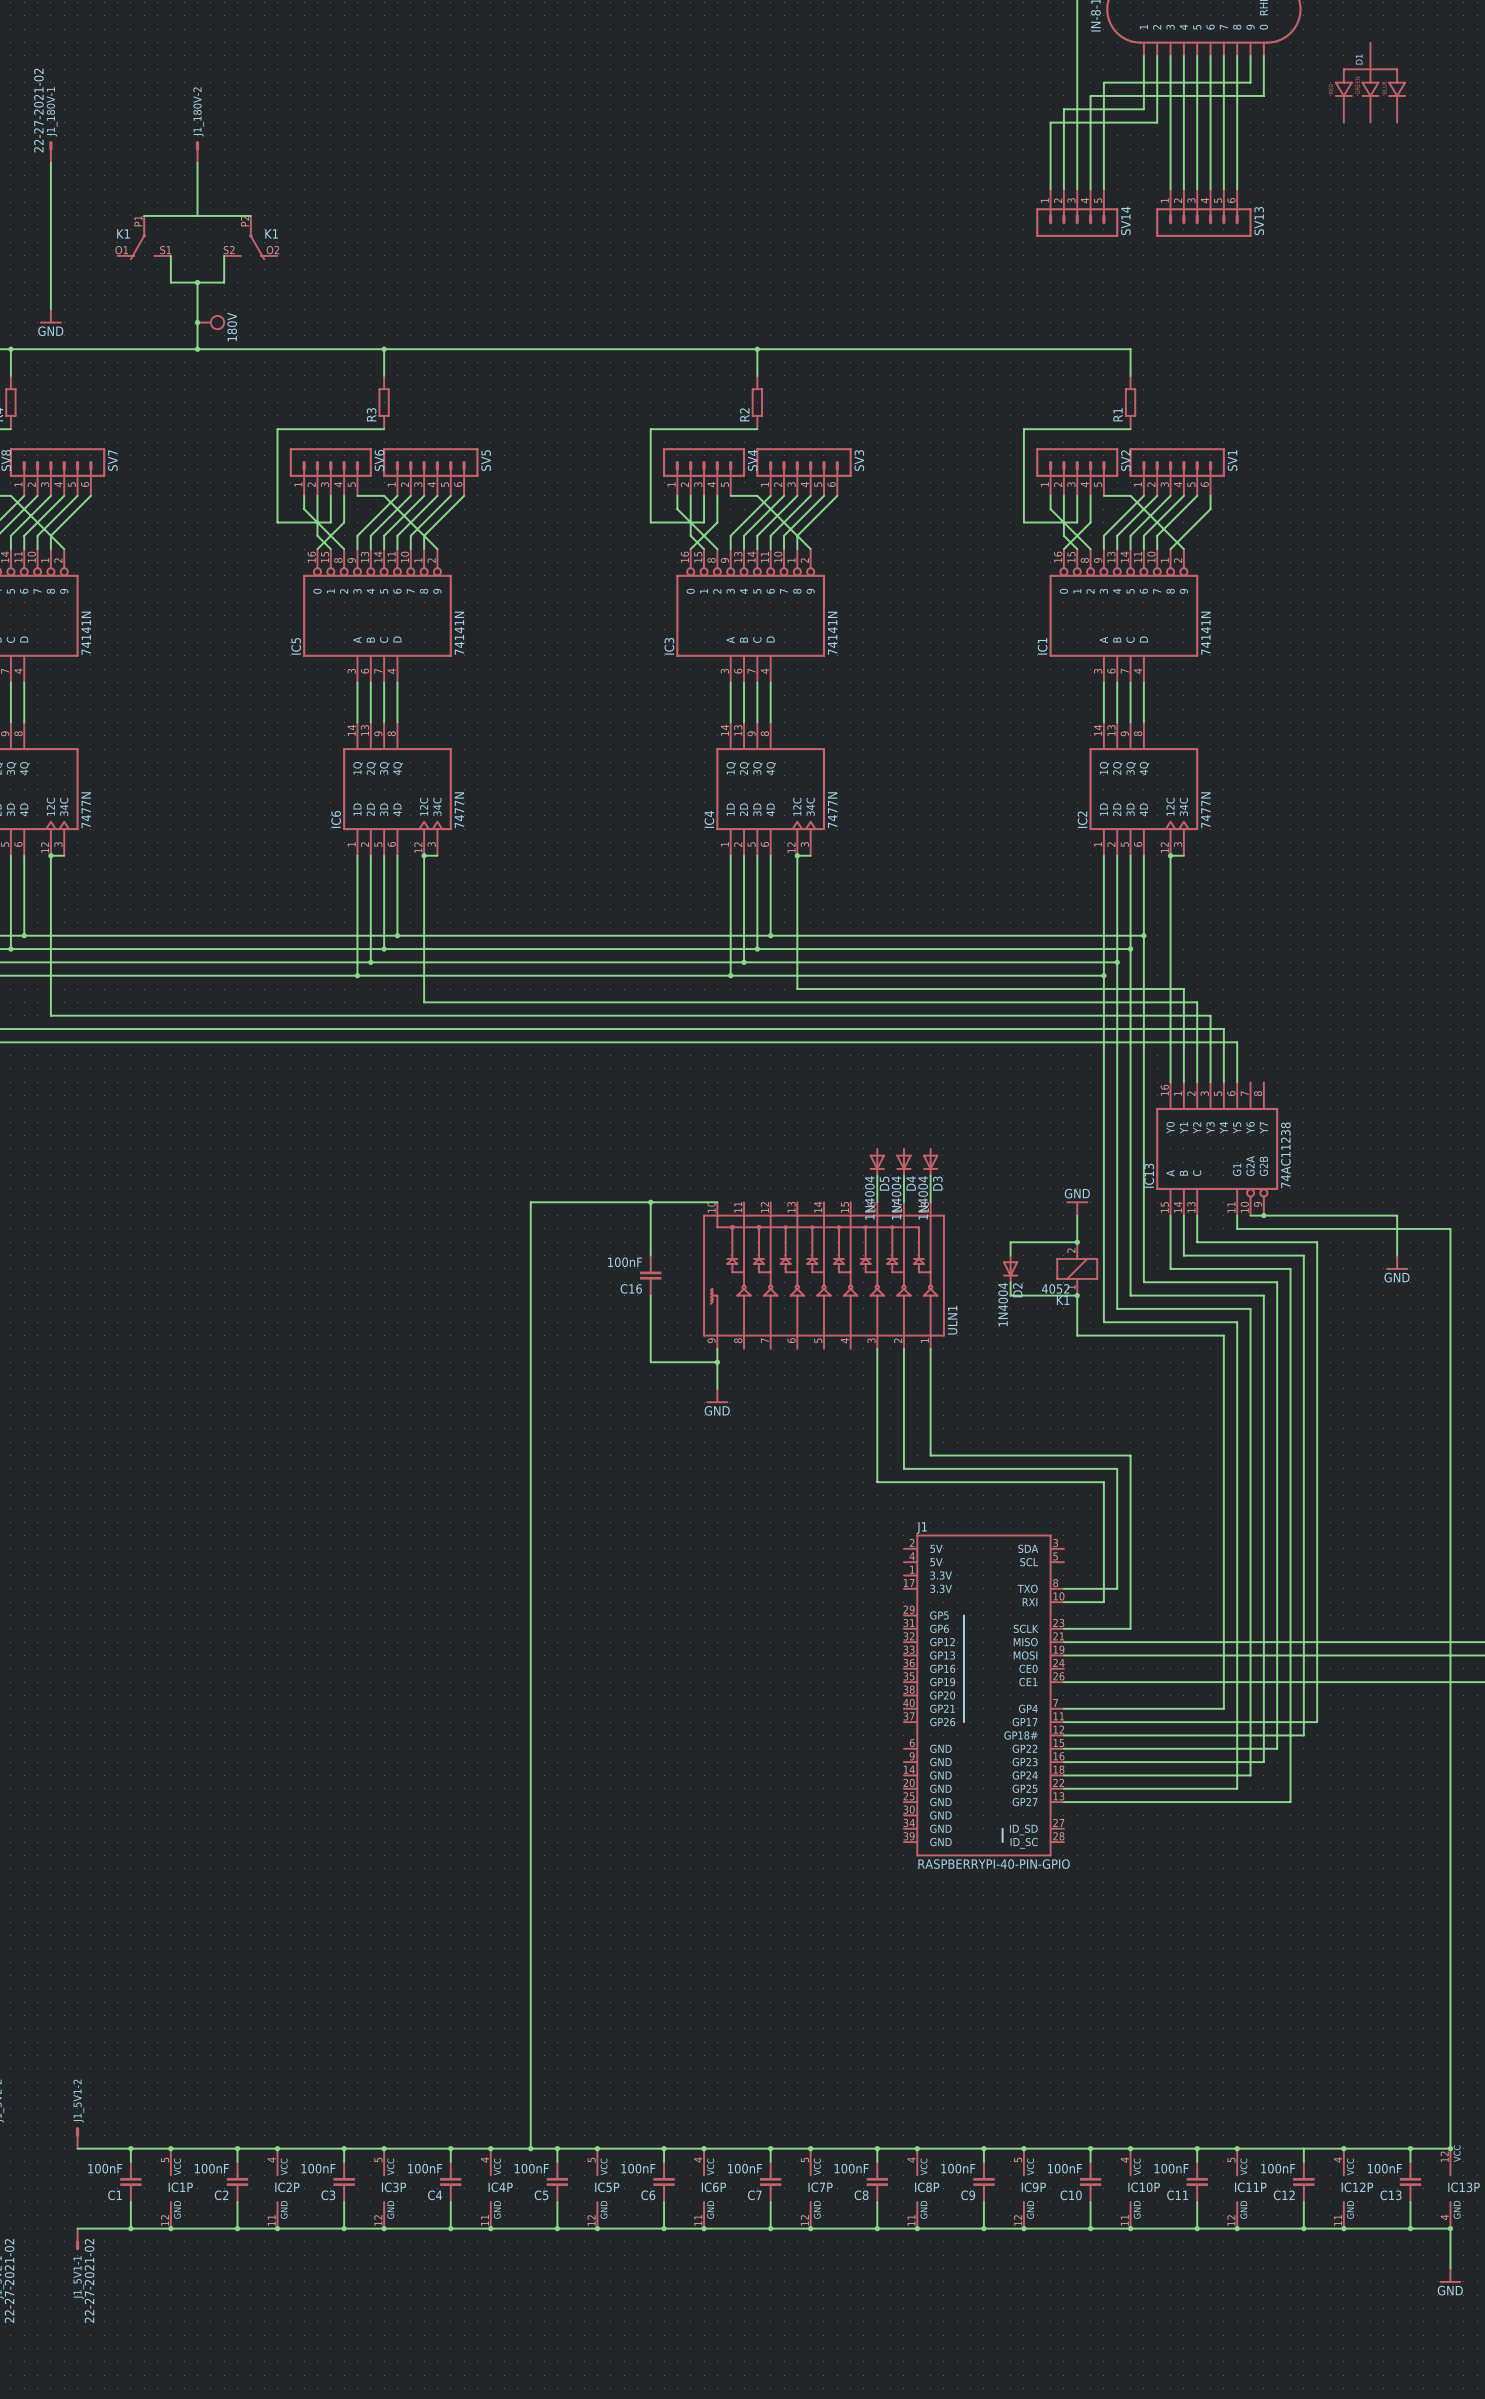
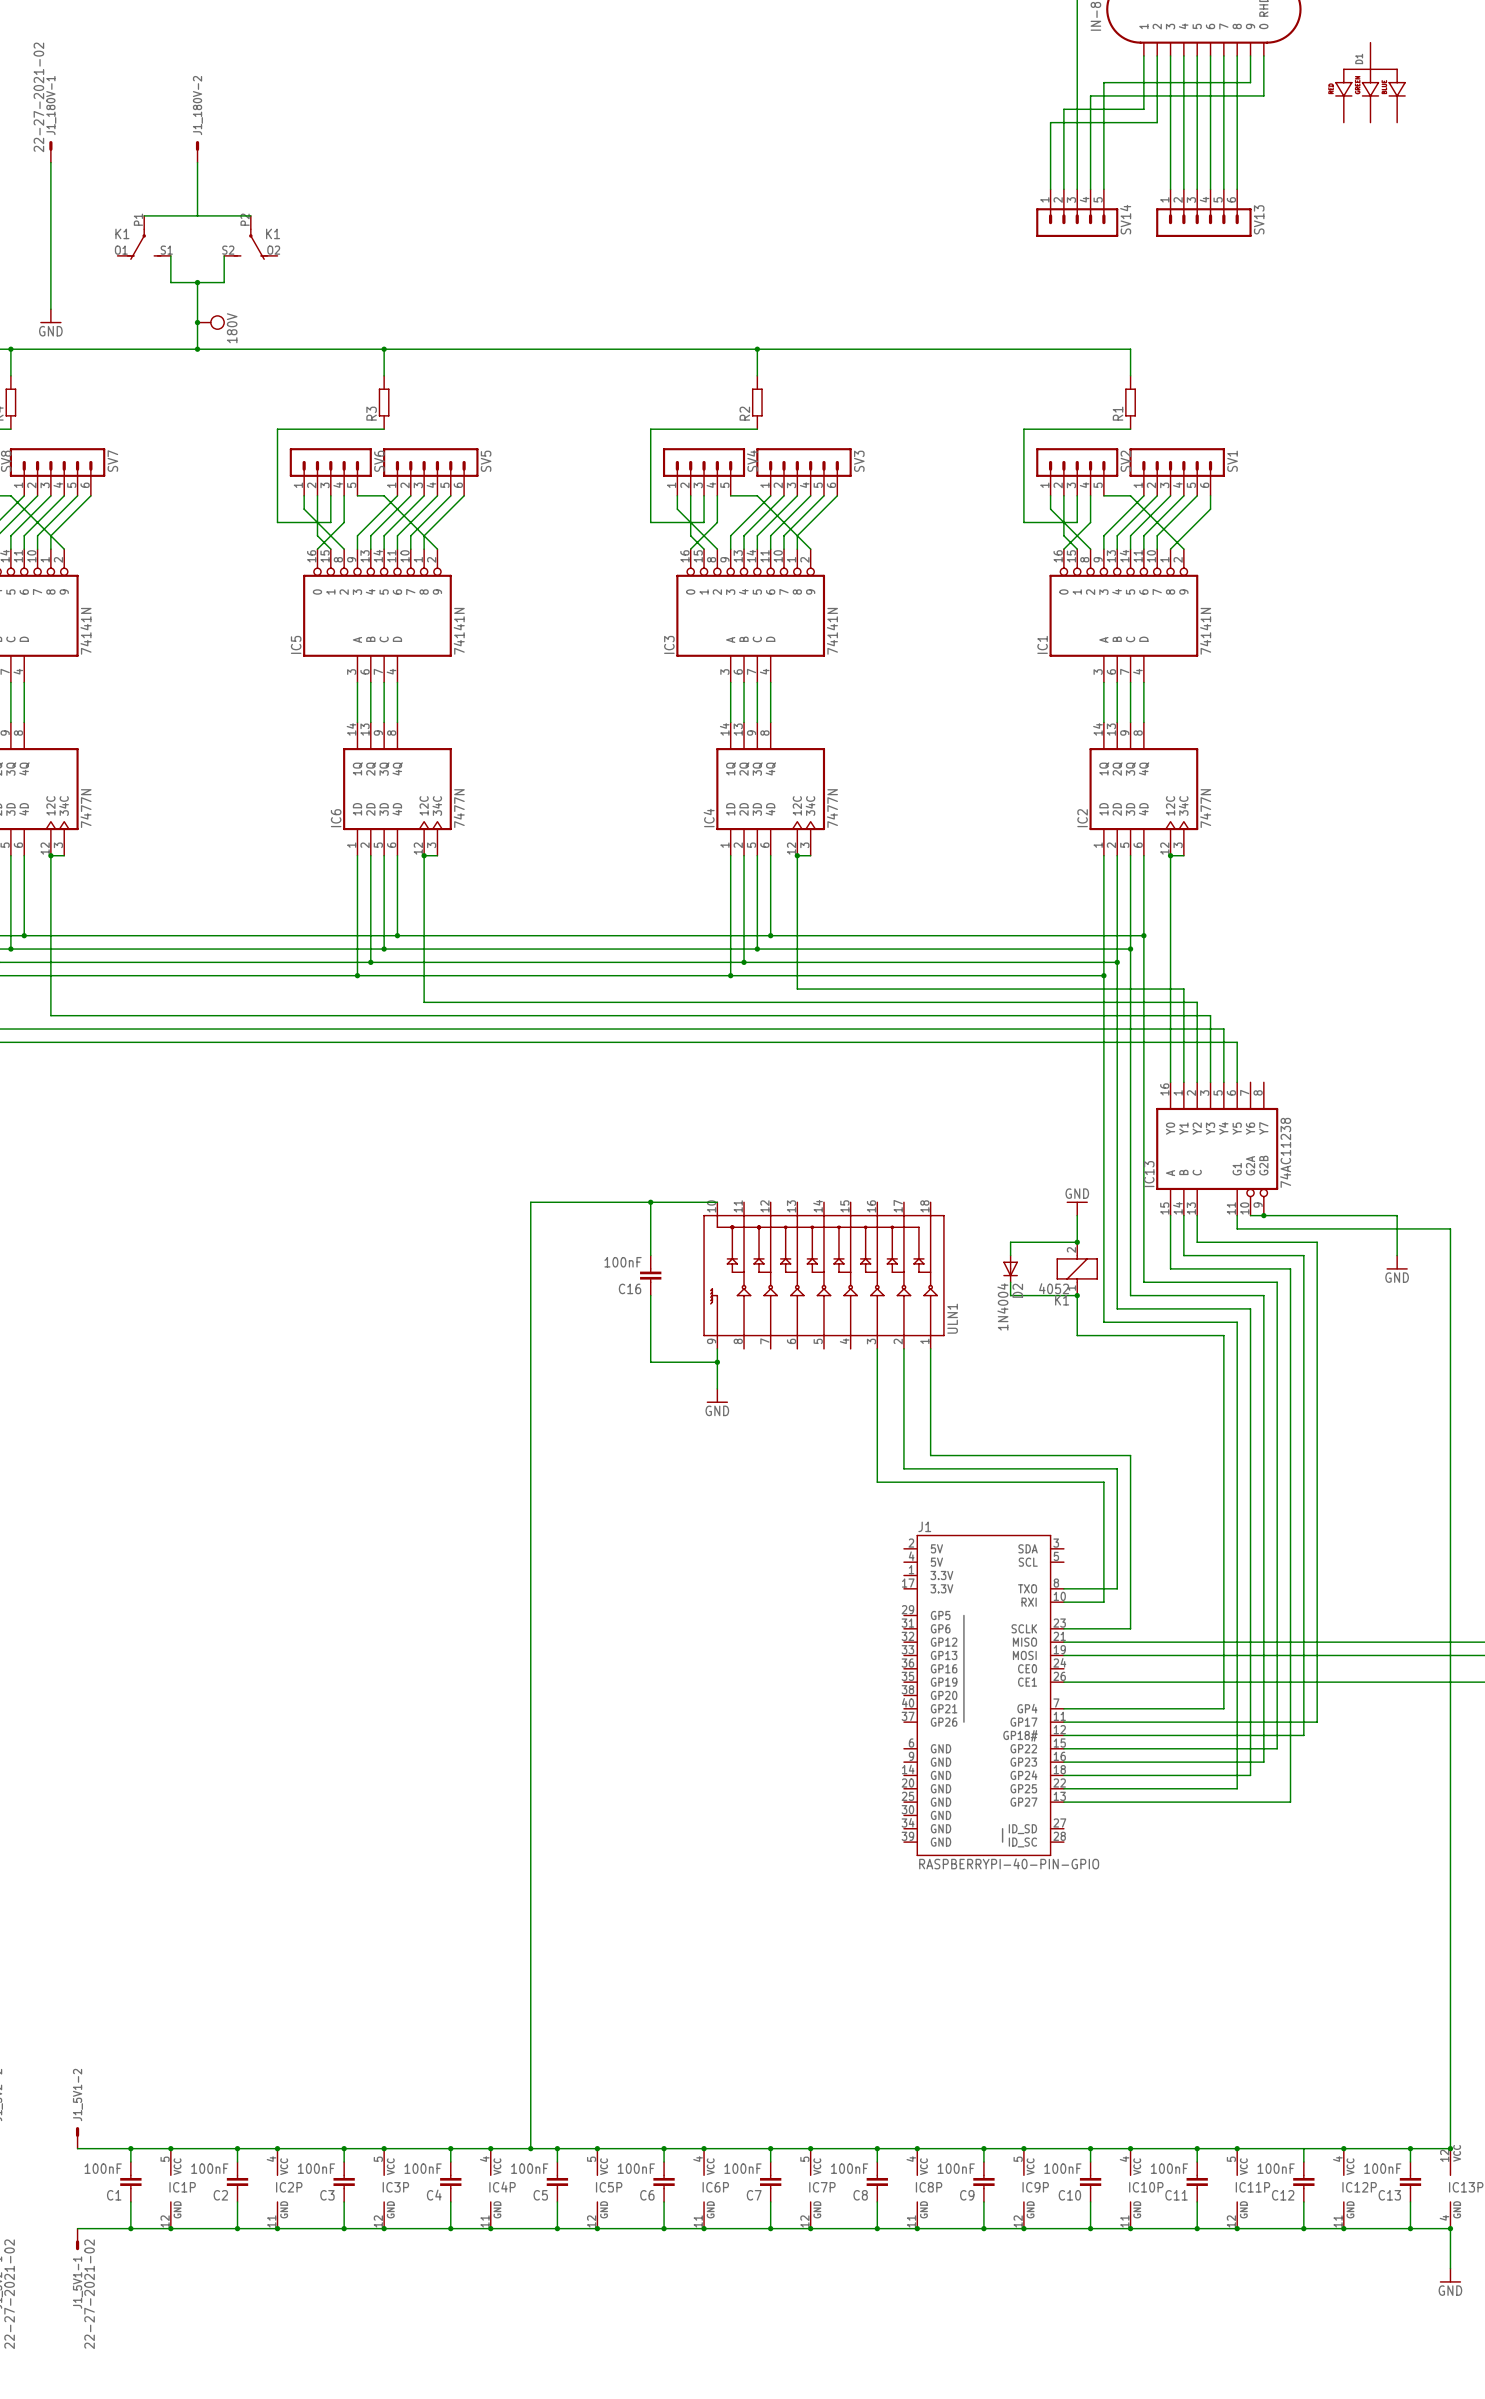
D5: 1N4004 (877, 1162) -> none
D4: 1N4004 (903, 1162) -> none
D3: 1N4004 (930, 1162) -> none
wire: (877, 1175) (877, 1202) -> none
wire: (903, 1175) (903, 1202) -> none
wire: (930, 1175) (930, 1202) -> none

